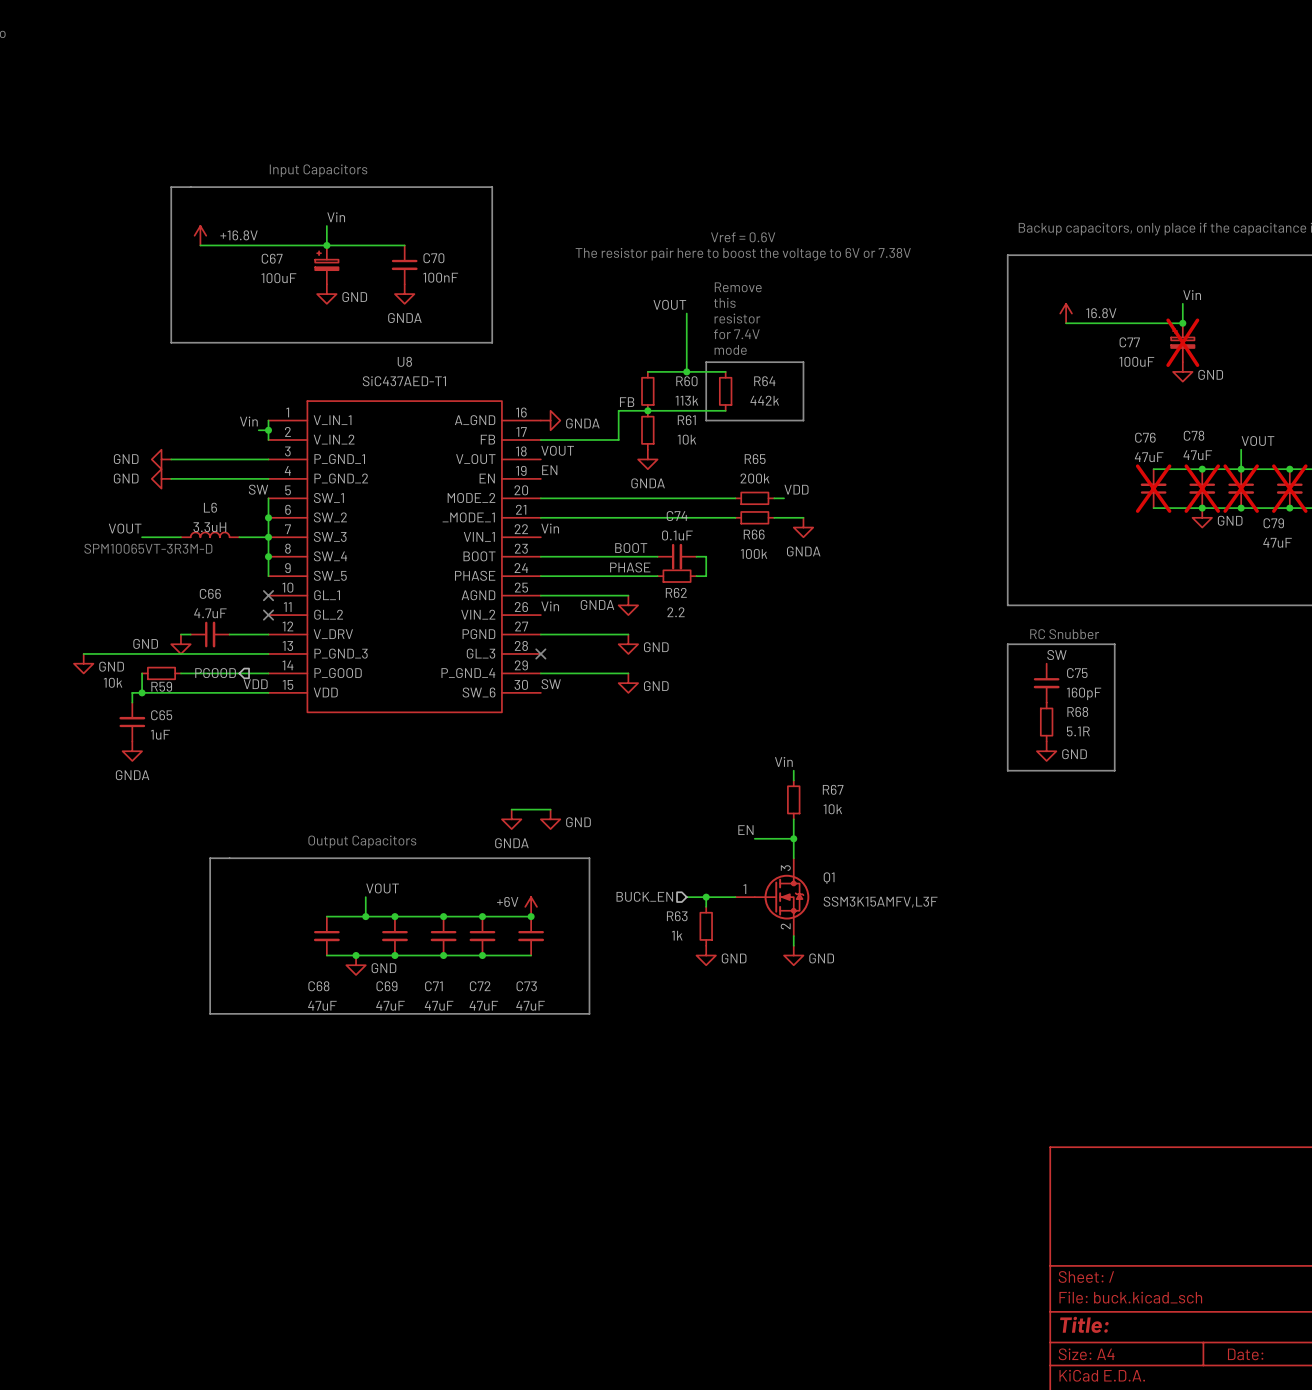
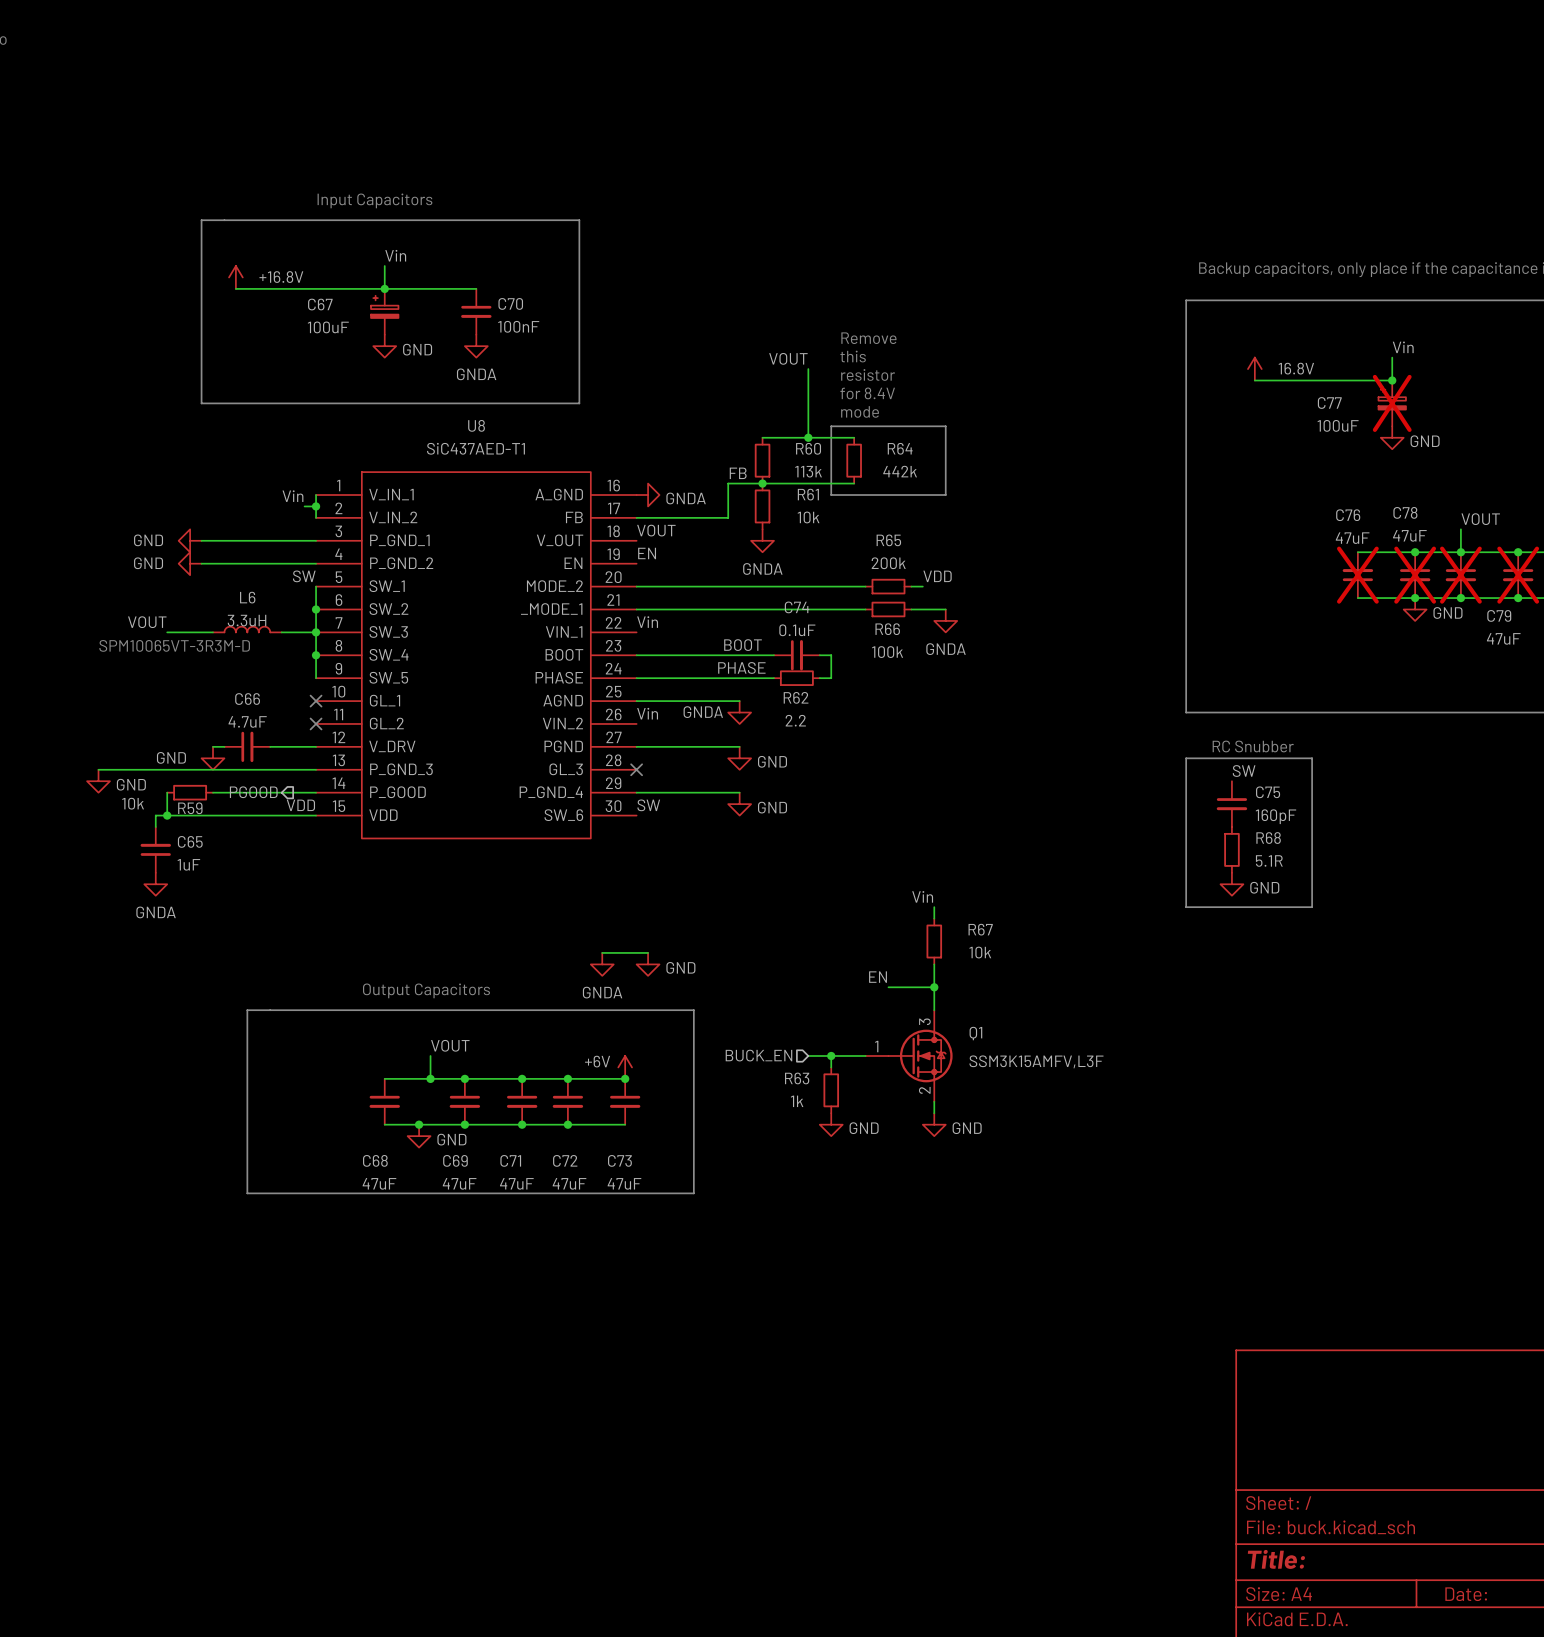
text: Vref = 0.6V (743, 237) -> none
text: The resistor pair here to boost the voltage to 6V or 7.38V (743, 254) -> none
text: for 7.4V (736, 334) -> for 8.4V (867, 393)

